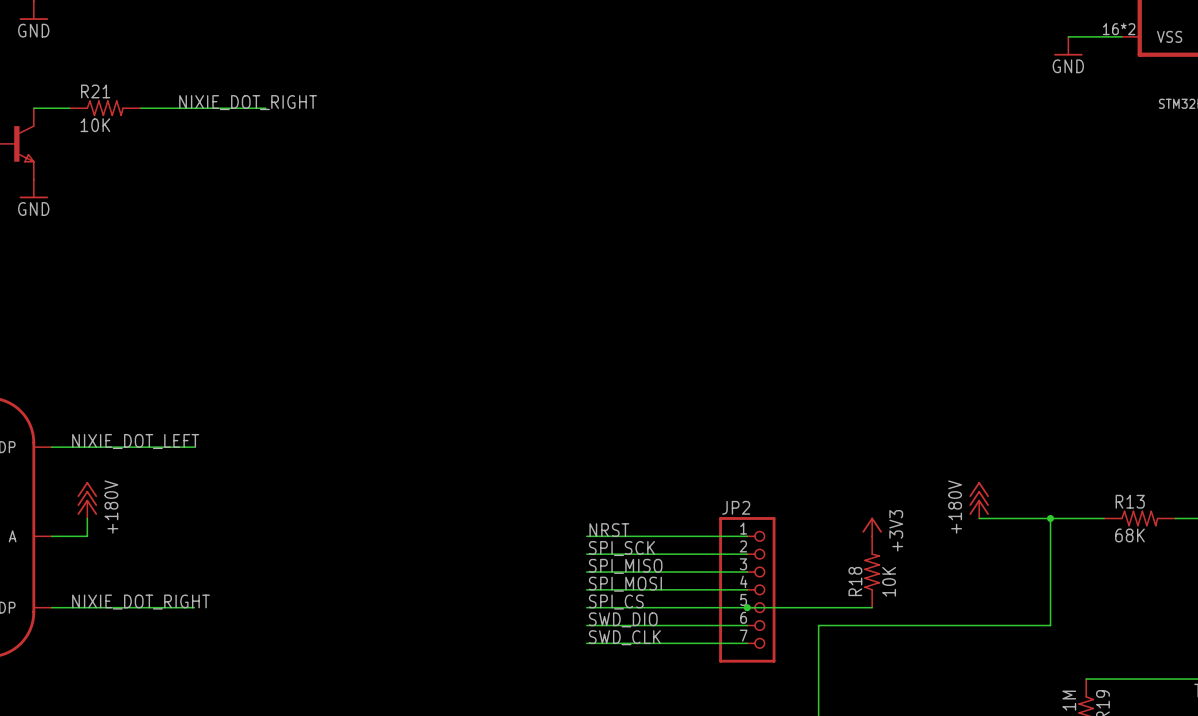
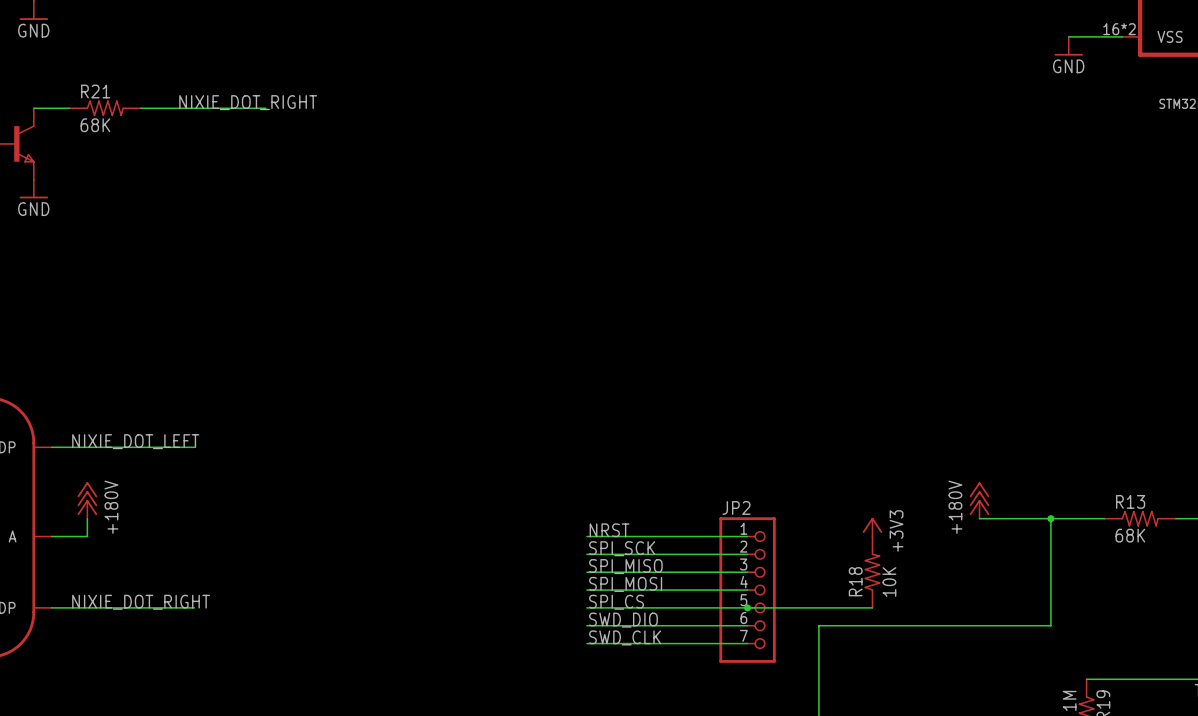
R21 value: 10K (95, 125) -> 68K (95, 125)

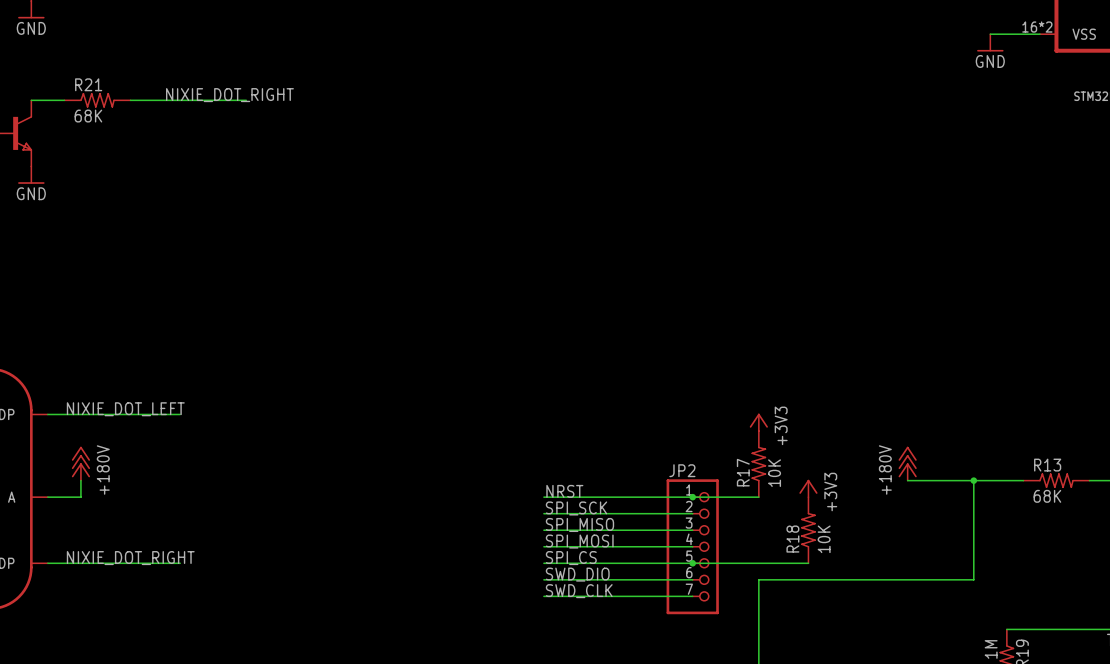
power symbol: none -> +3V3 (758, 422)
R17: none -> 10K (758, 464)
wire: none -> (692, 497) (758, 497)
junction: none -> (692, 497)

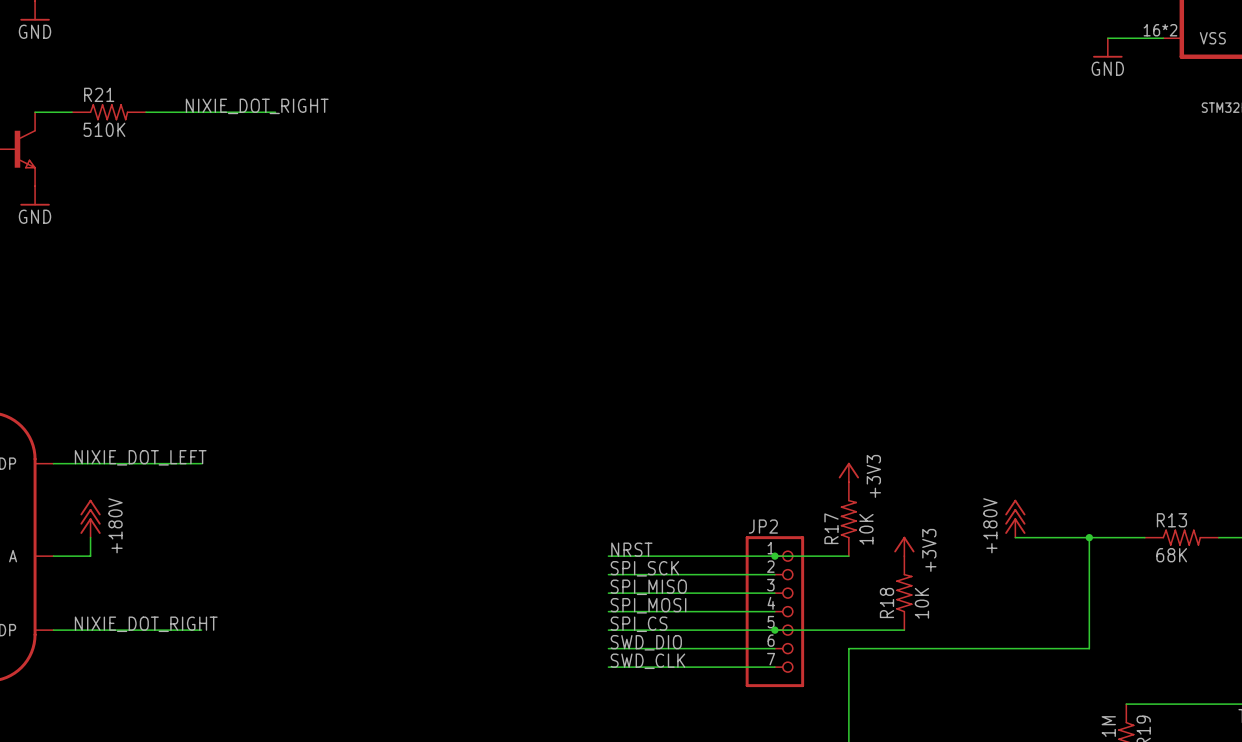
R21 value: 68K (88, 116) -> 510K (104, 129)

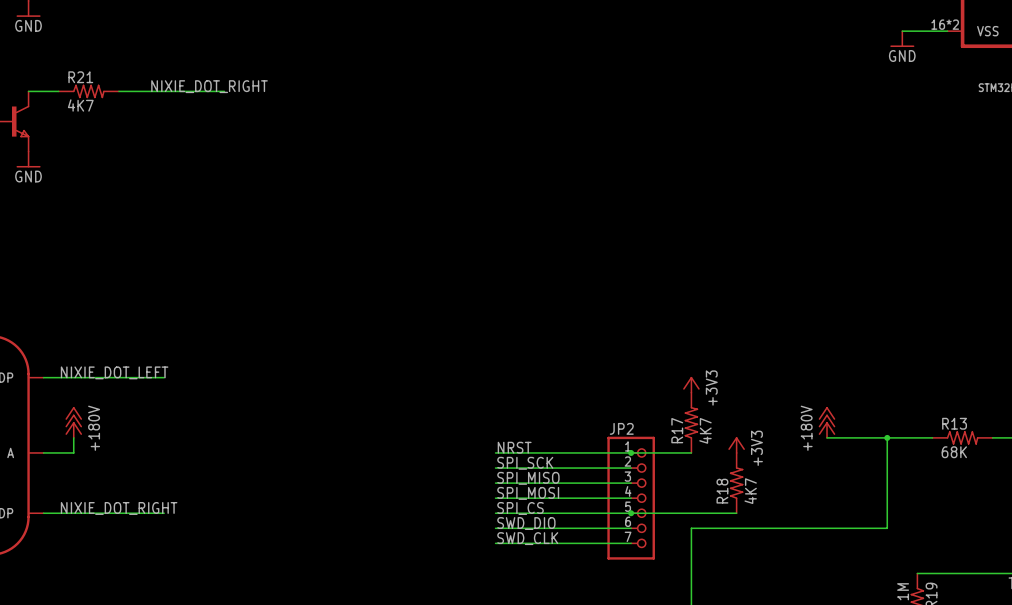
R21 value: 510K (104, 129) -> 4K7 (80, 105)
R17 value: 10K (866, 529) -> 4K7 (705, 430)
R18 value: 10K (921, 603) -> 4K7 (750, 491)

